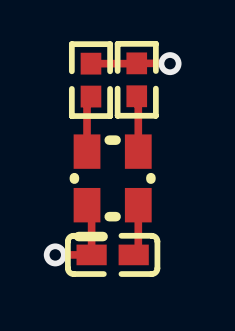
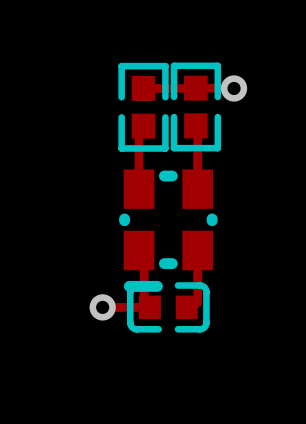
part footprint: [65, 232, 161, 277] -> [126, 282, 210, 333]

